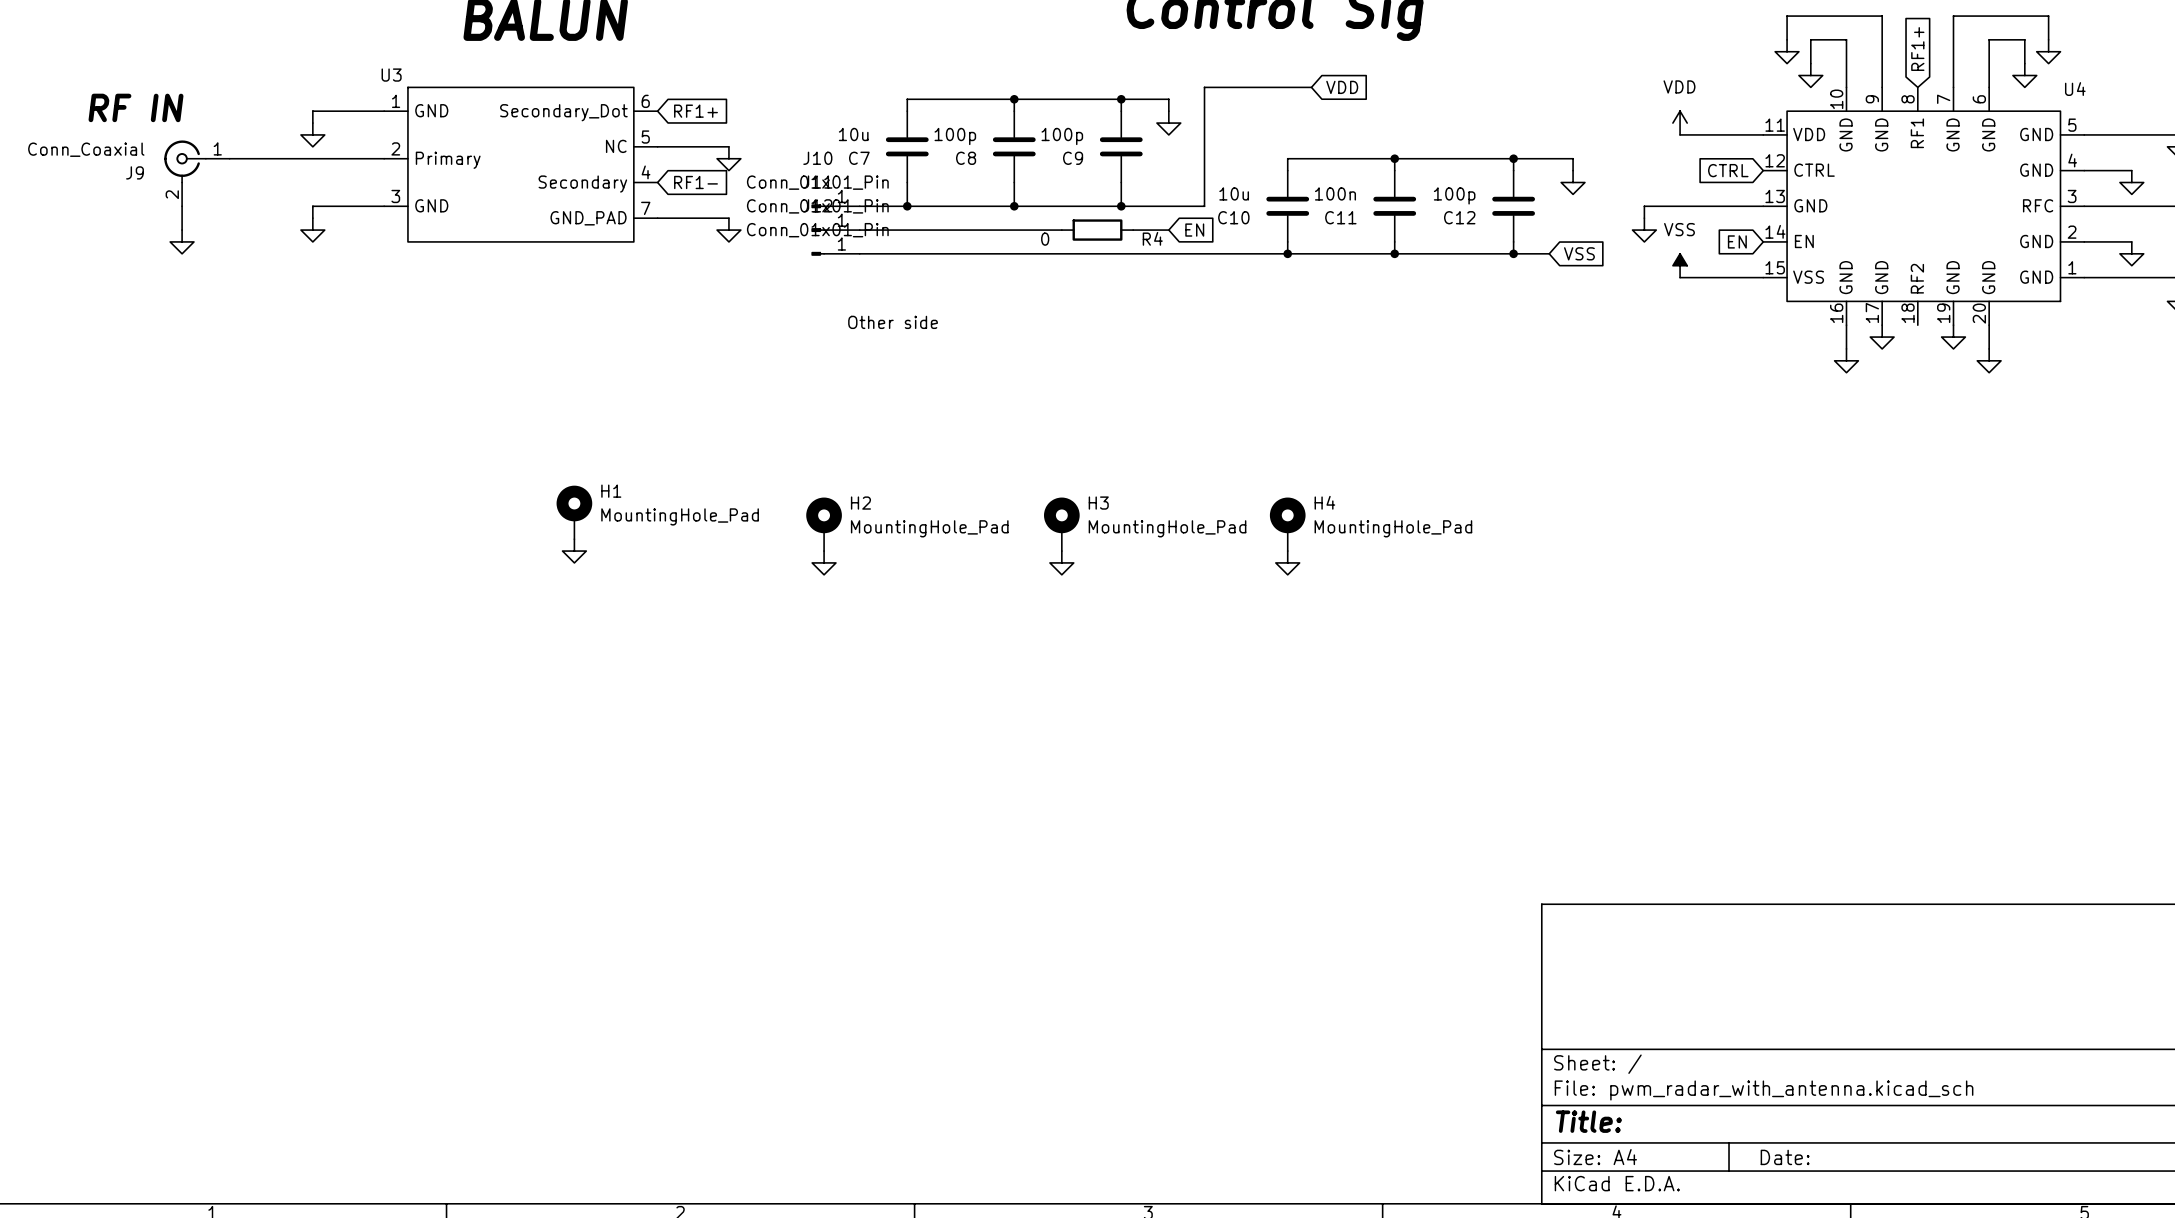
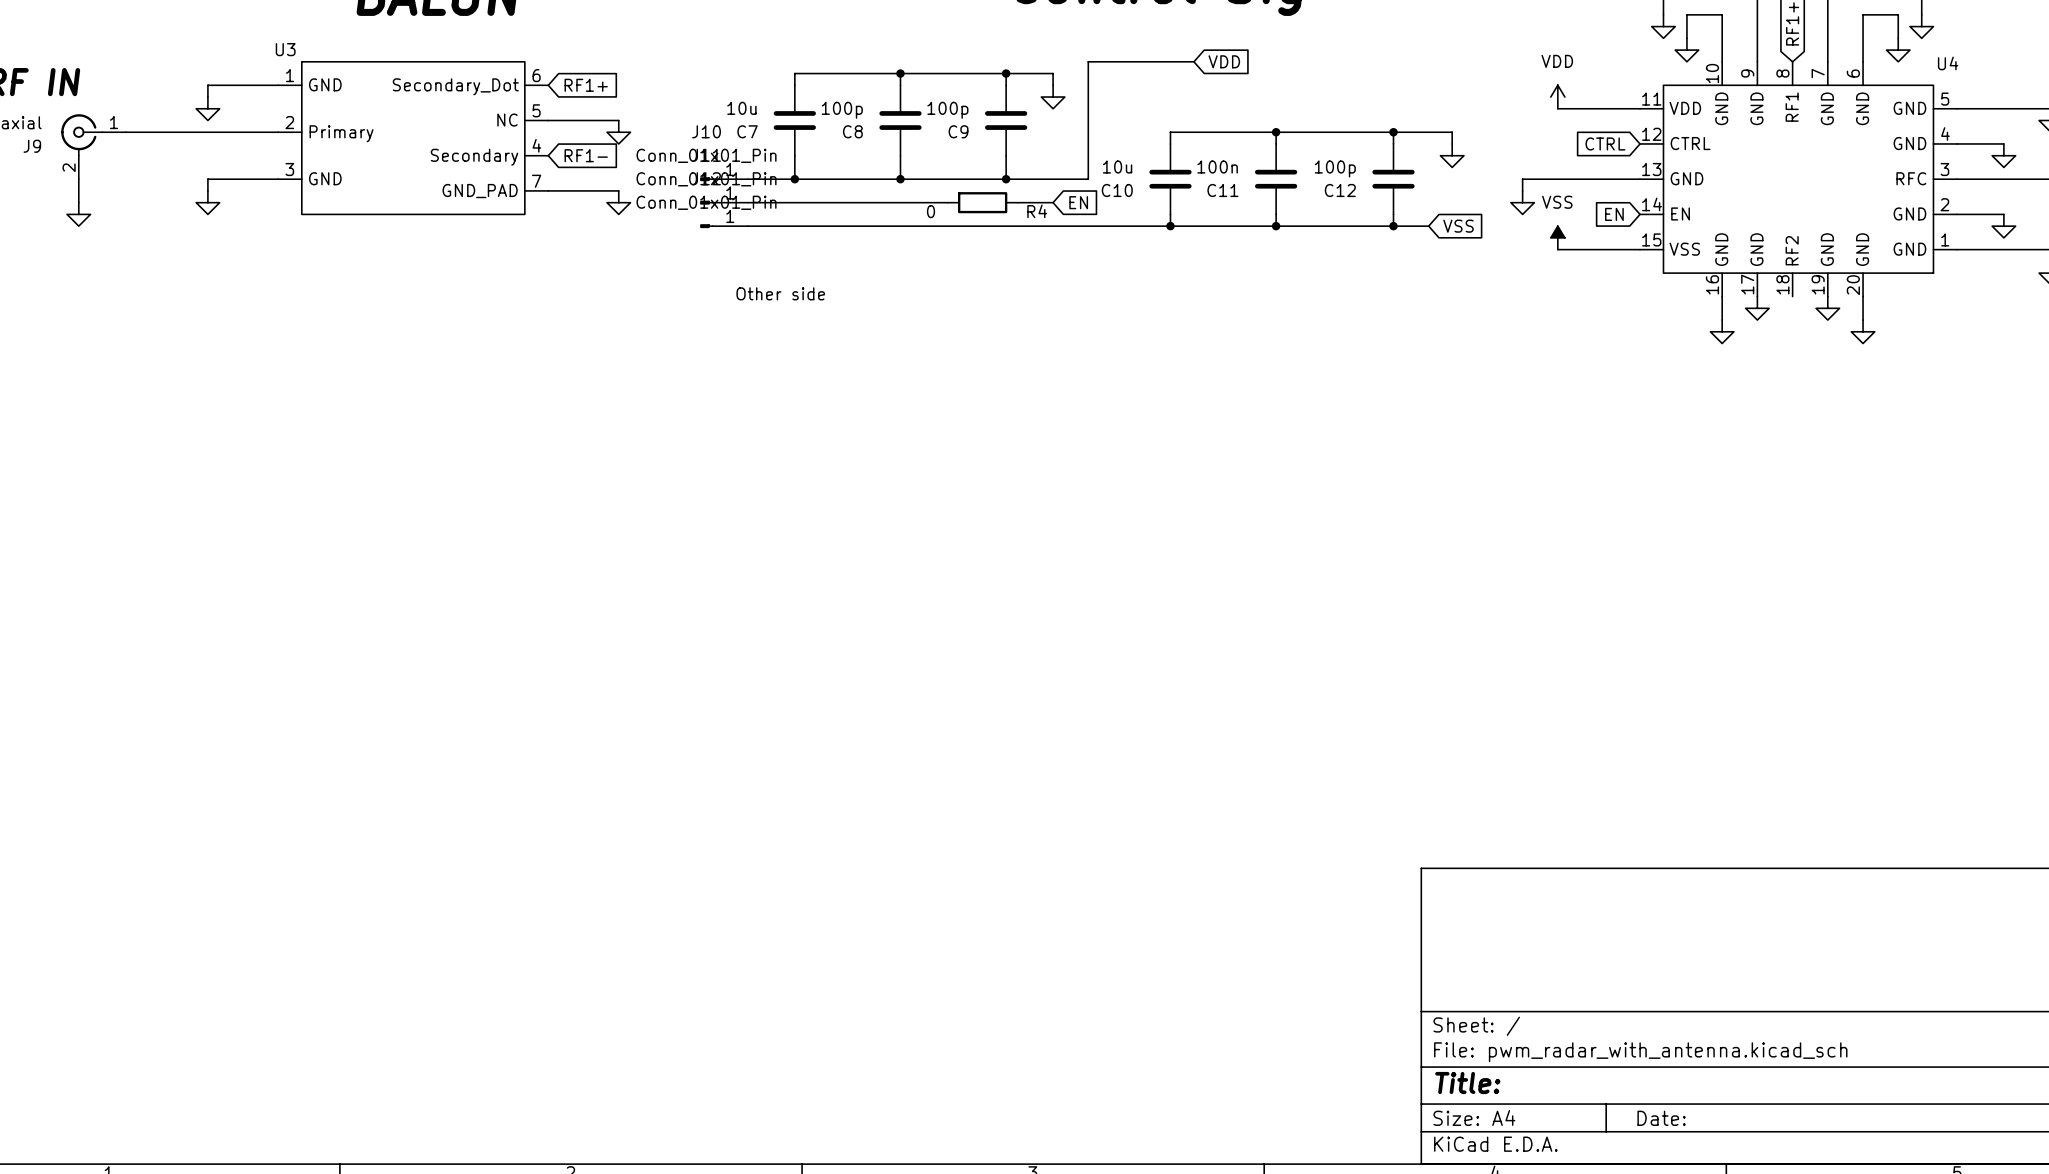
H1: MountingHole_Pad (574, 512) -> none
H2: MountingHole_Pad (824, 524) -> none
H3: MountingHole_Pad (1061, 524) -> none
H4: MountingHole_Pad (1287, 524) -> none
power symbol: (574, 551) -> none
power symbol: (824, 562) -> none
power symbol: (1061, 562) -> none
power symbol: (1287, 562) -> none

